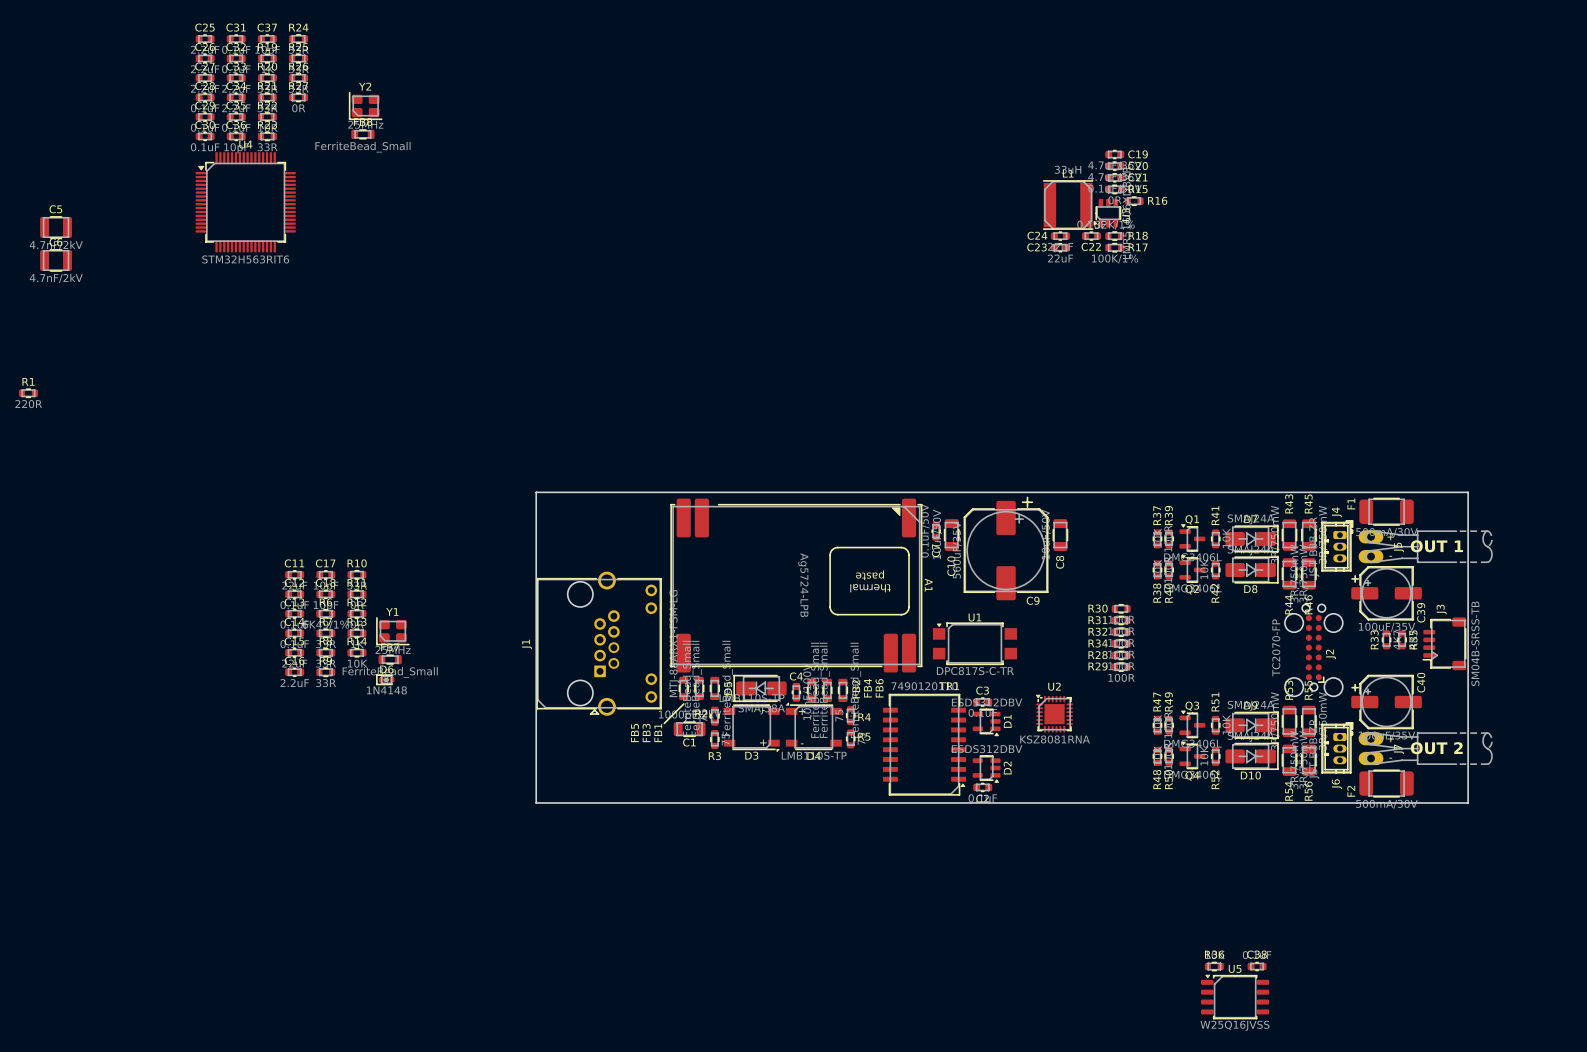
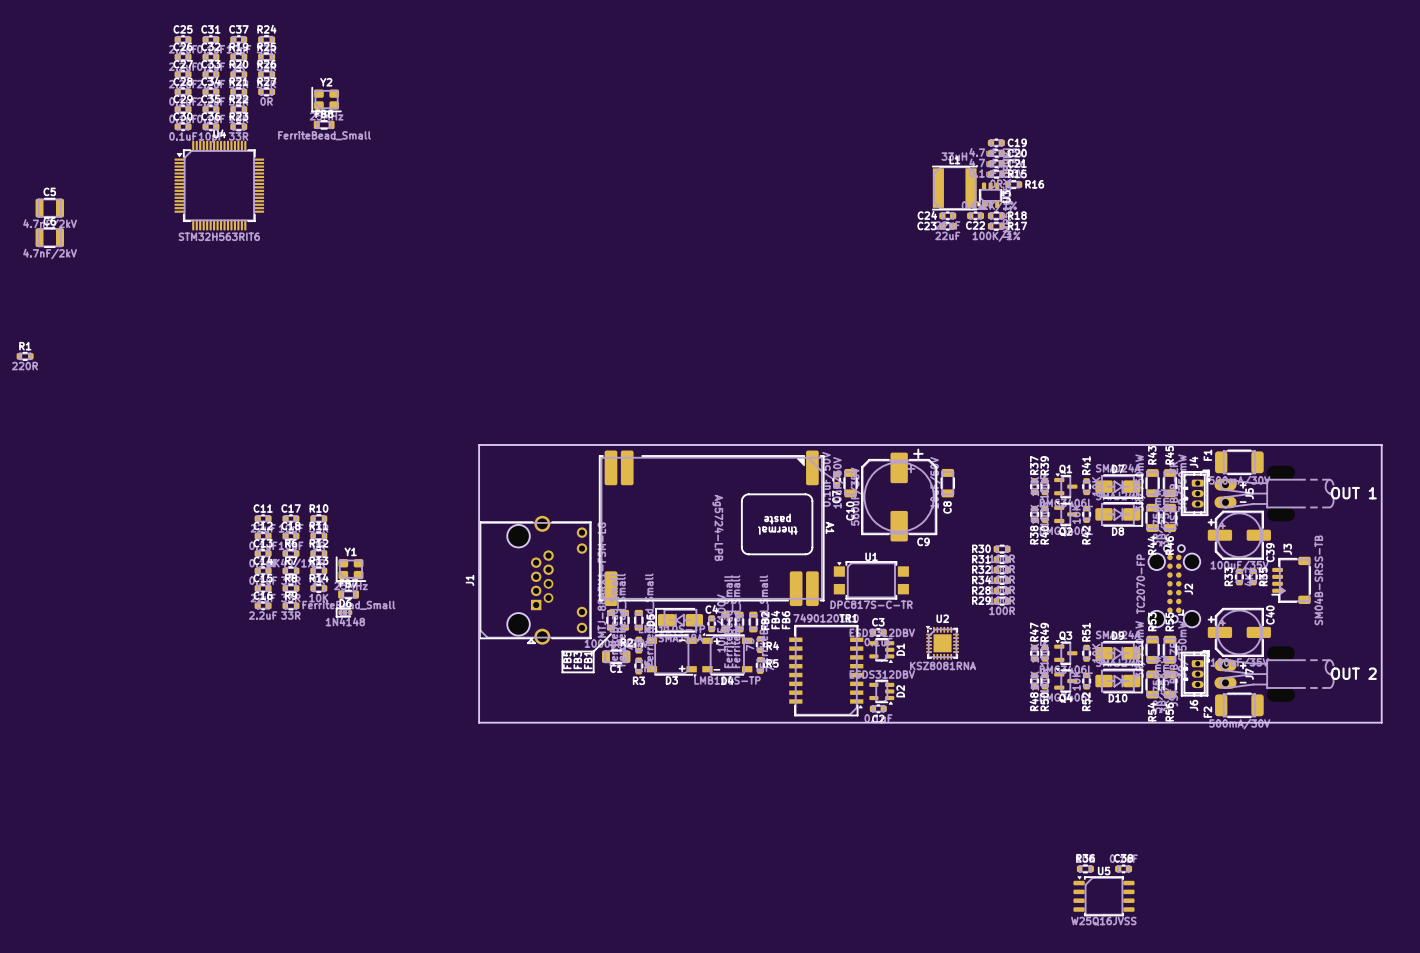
board edge: (1468, 492) (1468, 802) -> (1312, 444) (1381, 444) (1381, 722) (1312, 722)
text position: OUT 1 (1436, 546) -> OUT 1 (1353, 493)
line: none -> (562, 651) (593, 651) (593, 672) (562, 672) (562, 651)
text position: OUT 2 (1436, 748) -> OUT 2 (1353, 673)

